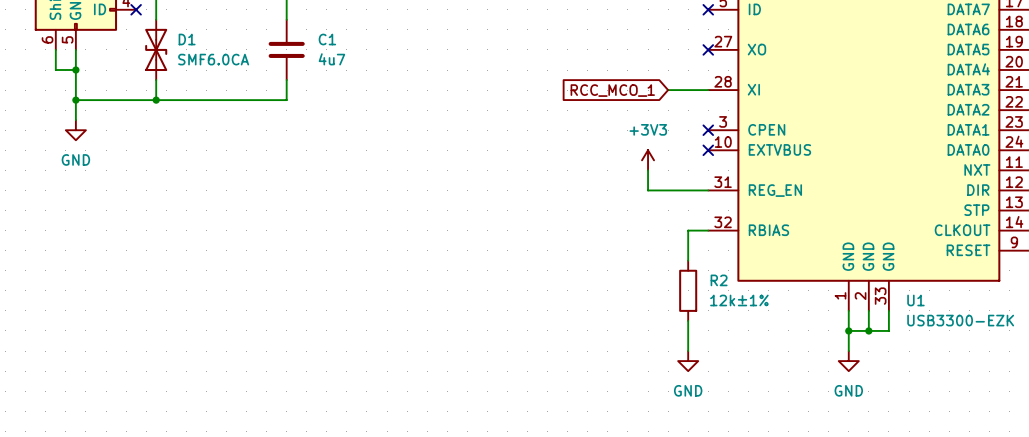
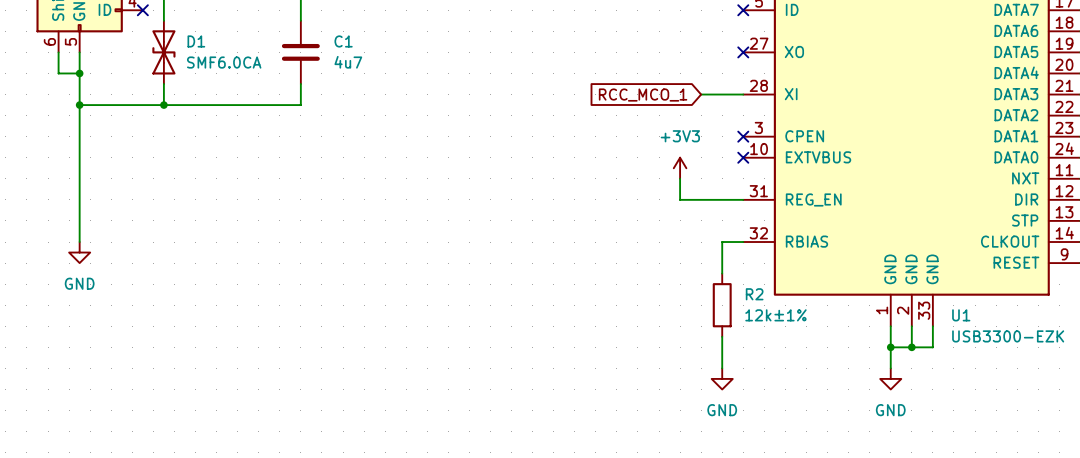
wire: none -> (79, 126) (79, 242)
power symbol position: GND (75, 130) -> GND (79, 252)

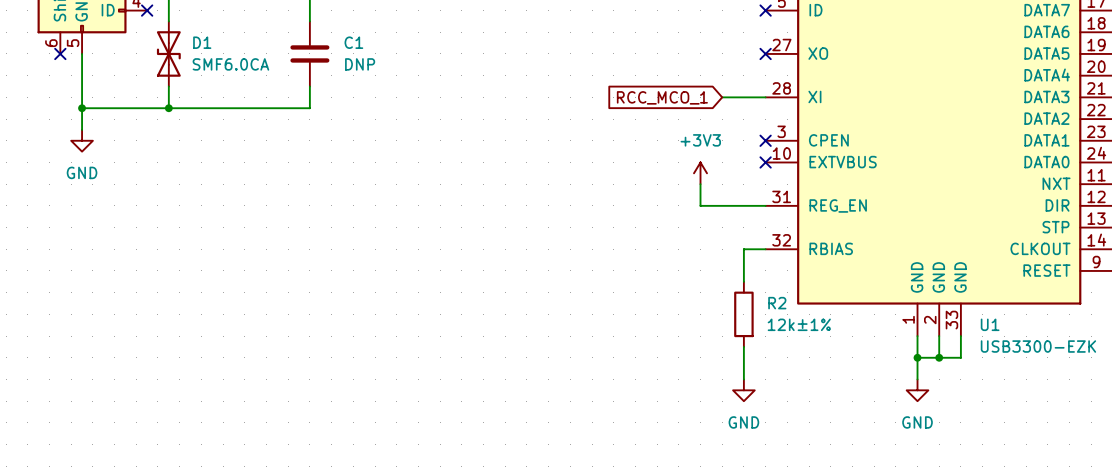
wire: (58, 52) (58, 73) (79, 73) -> none
no-connect mark: none -> (60, 53)
C1 value: 4u7 (348, 62) -> DNP (360, 64)
junction: (79, 73) -> none
wire: (79, 126) (79, 242) -> none
power symbol position: GND (79, 252) -> GND (82, 140)

